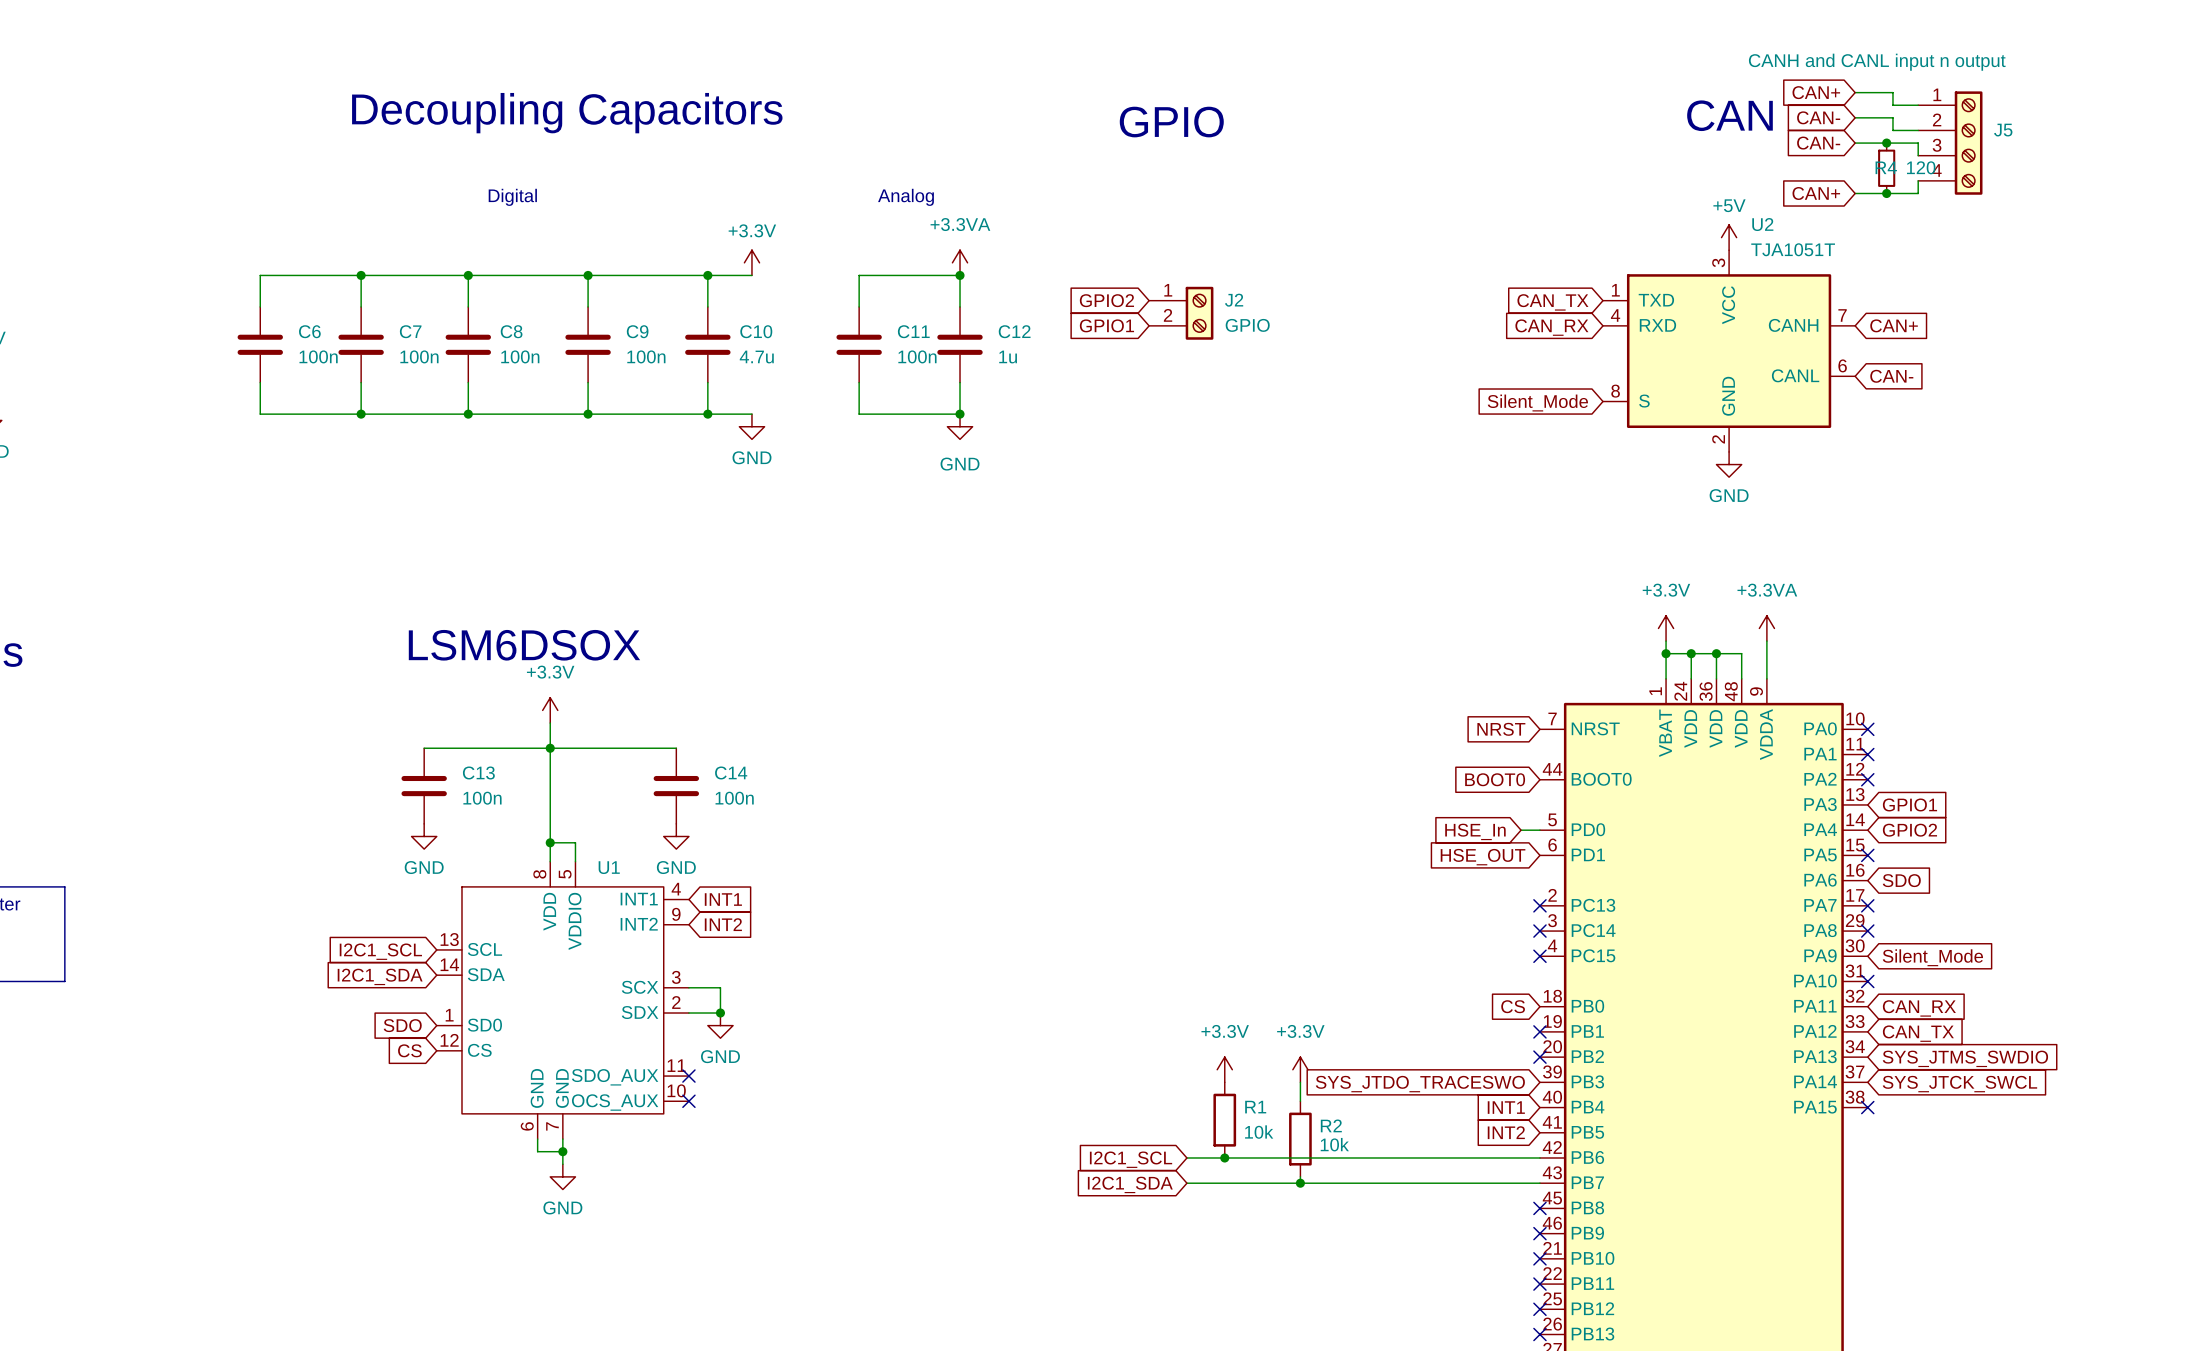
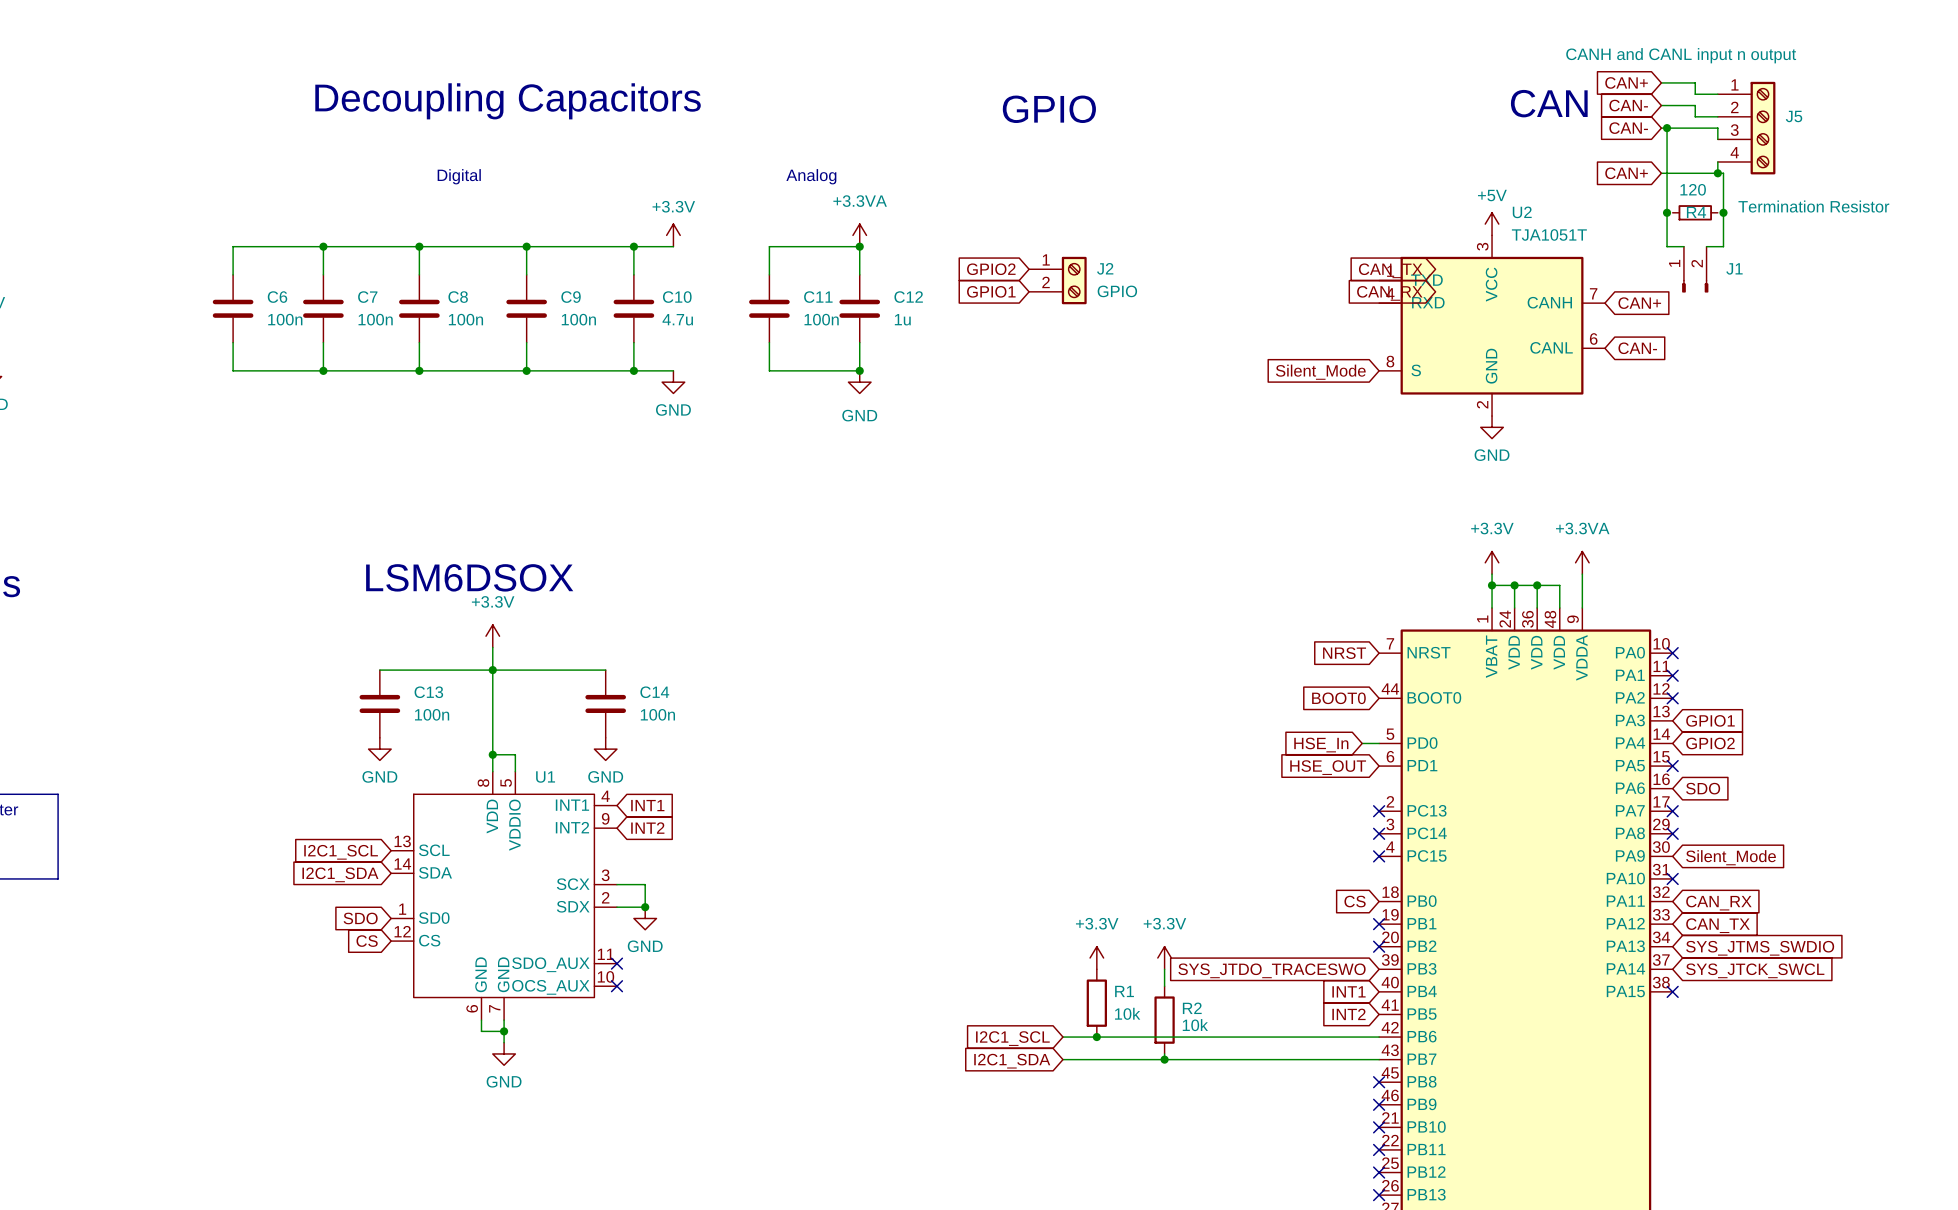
wire: none -> (1667, 128) (1667, 246) (1683, 246)
junction position: (1886, 143) -> (1667, 128)
R4 value position: 120 (1921, 167) -> 120 (1693, 189)
R4 rotation: 0° (1886, 168) -> 90° clockwise (1695, 212)
R4 position: (1886, 168) -> (1695, 212)
junction: (1886, 193) -> none
wire: none -> (1717, 173) (1723, 173) (1723, 246) (1706, 246)
junction: none -> (1717, 173)
power symbol position: +5V (1729, 237) -> +5V (1492, 224)
junction: none -> (1667, 212)
junction: none -> (1723, 212)
J1: none -> Termination Resistor (1695, 269)
global label position: CAN+ (1894, 325) -> CAN+ (1639, 303)
U2 position: (1729, 351) -> (1492, 325)
global label position: CAN- (1891, 376) -> CAN- (1637, 348)
global label position: Silent_Mode (1537, 403) -> Silent_Mode (1320, 372)
power symbol position: GND (1729, 464) -> GND (1492, 427)

